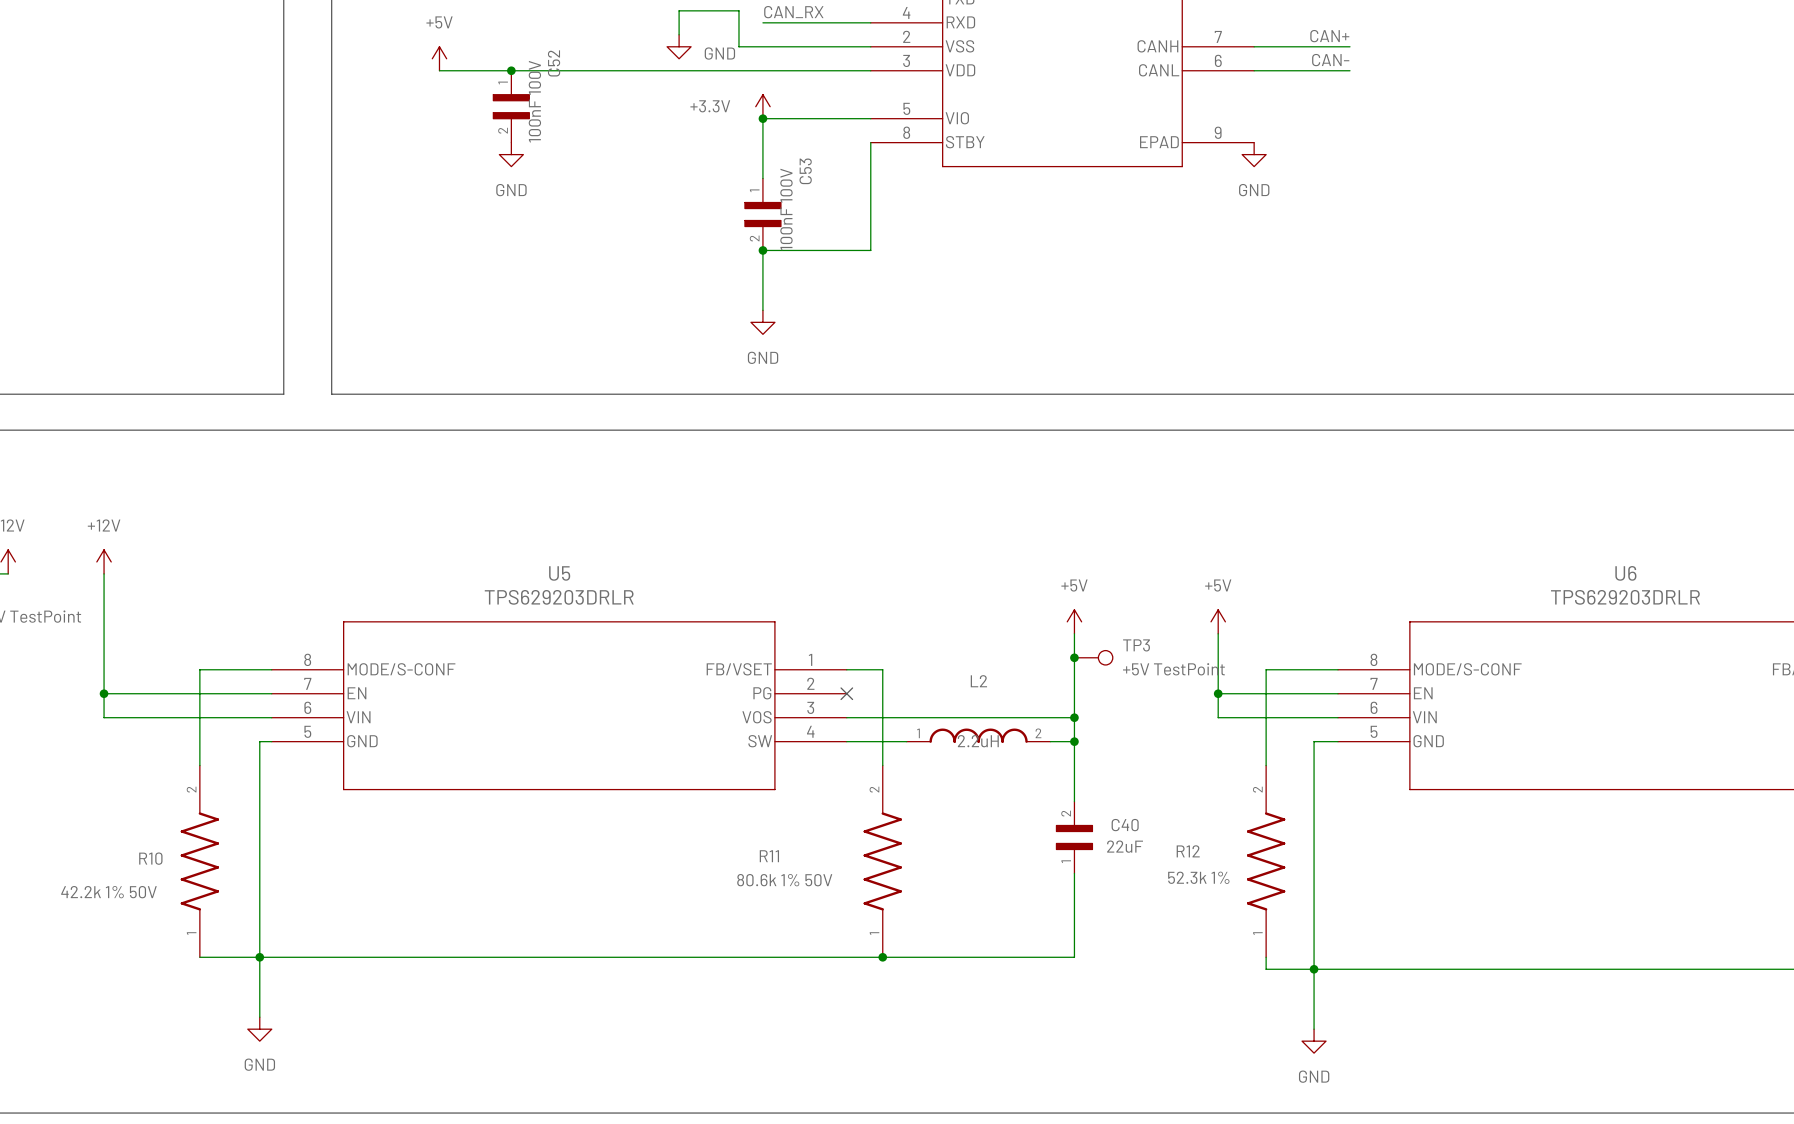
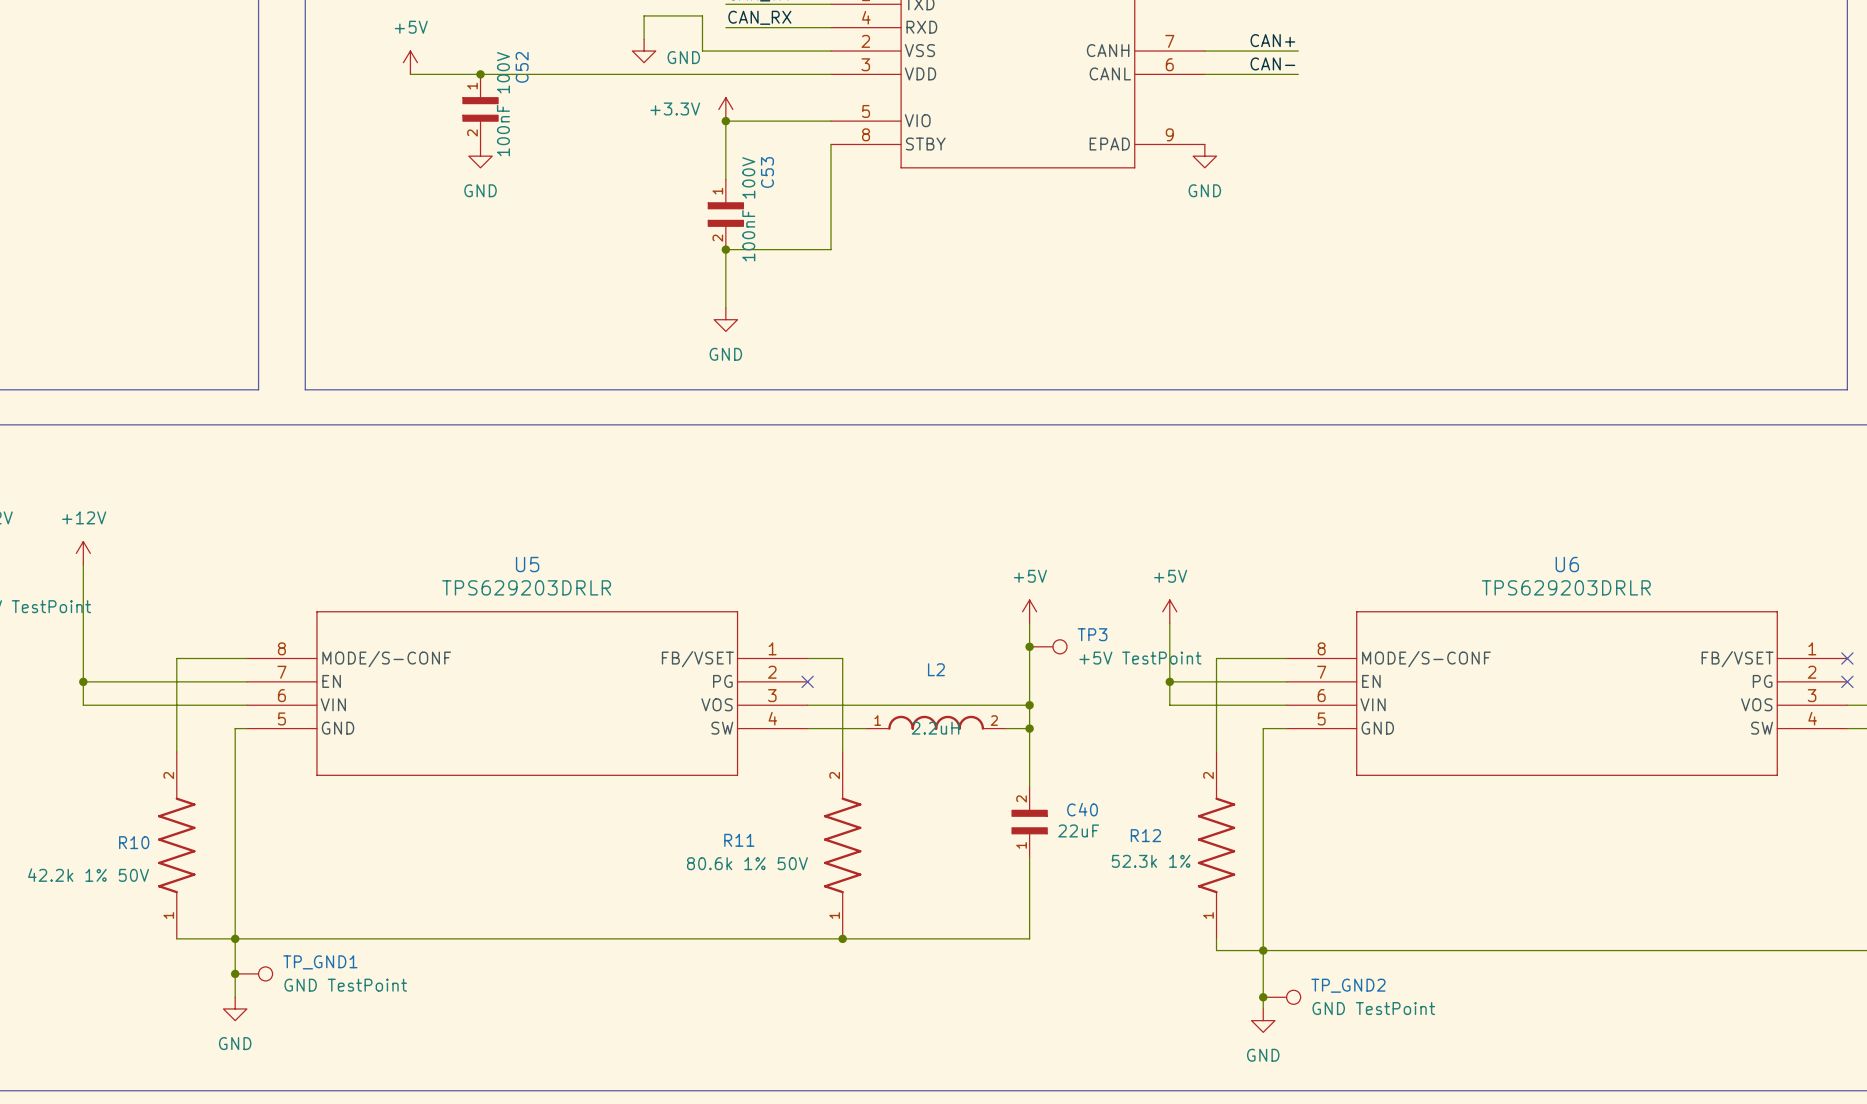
junction: none -> (235, 973)
TP_GND1: none -> GND TestPoint (253, 973)
junction: none -> (1263, 997)
TP_GND2: none -> GND TestPoint (1281, 997)

